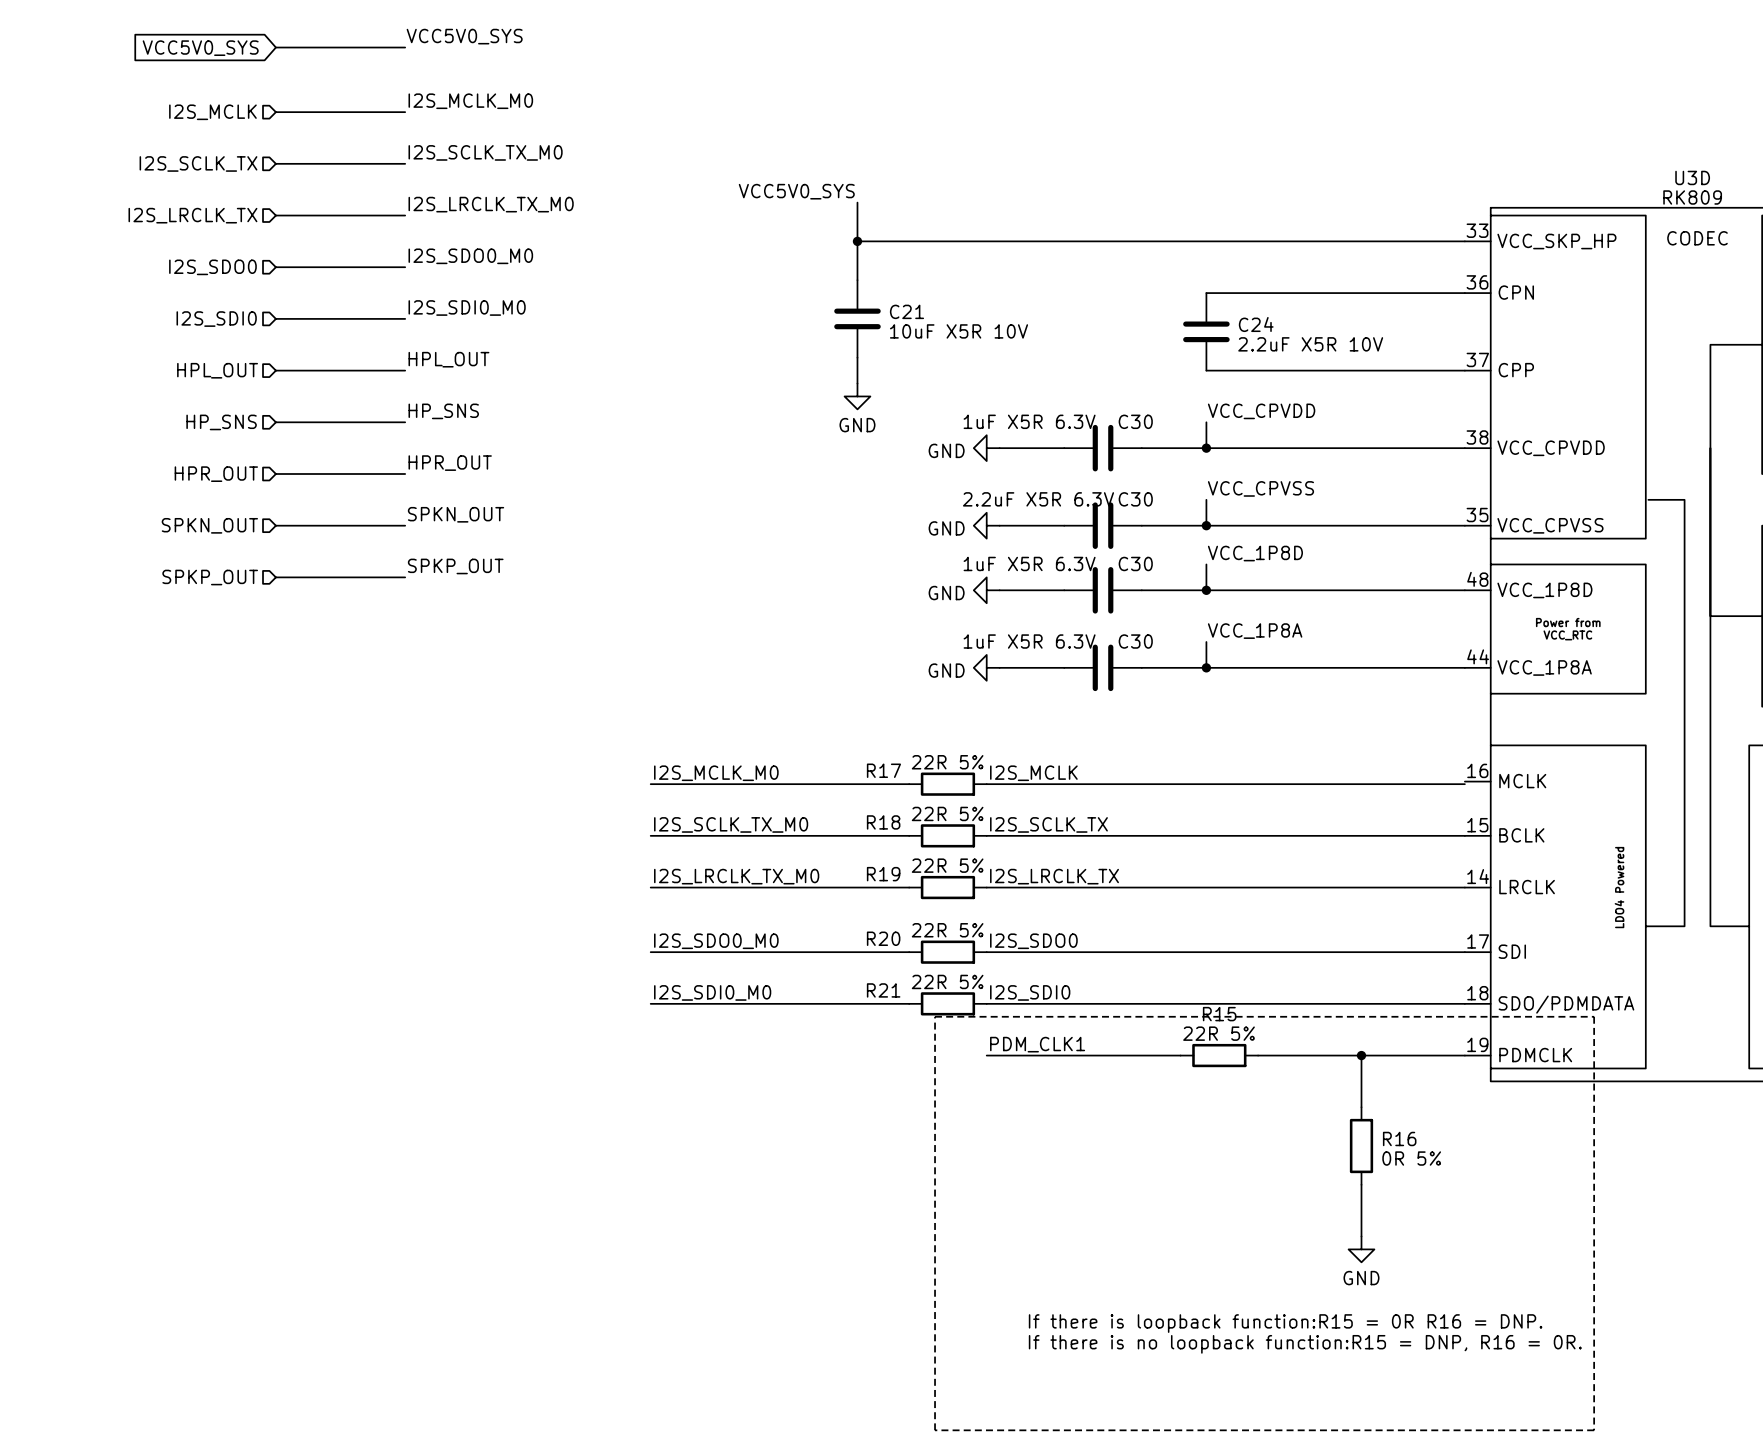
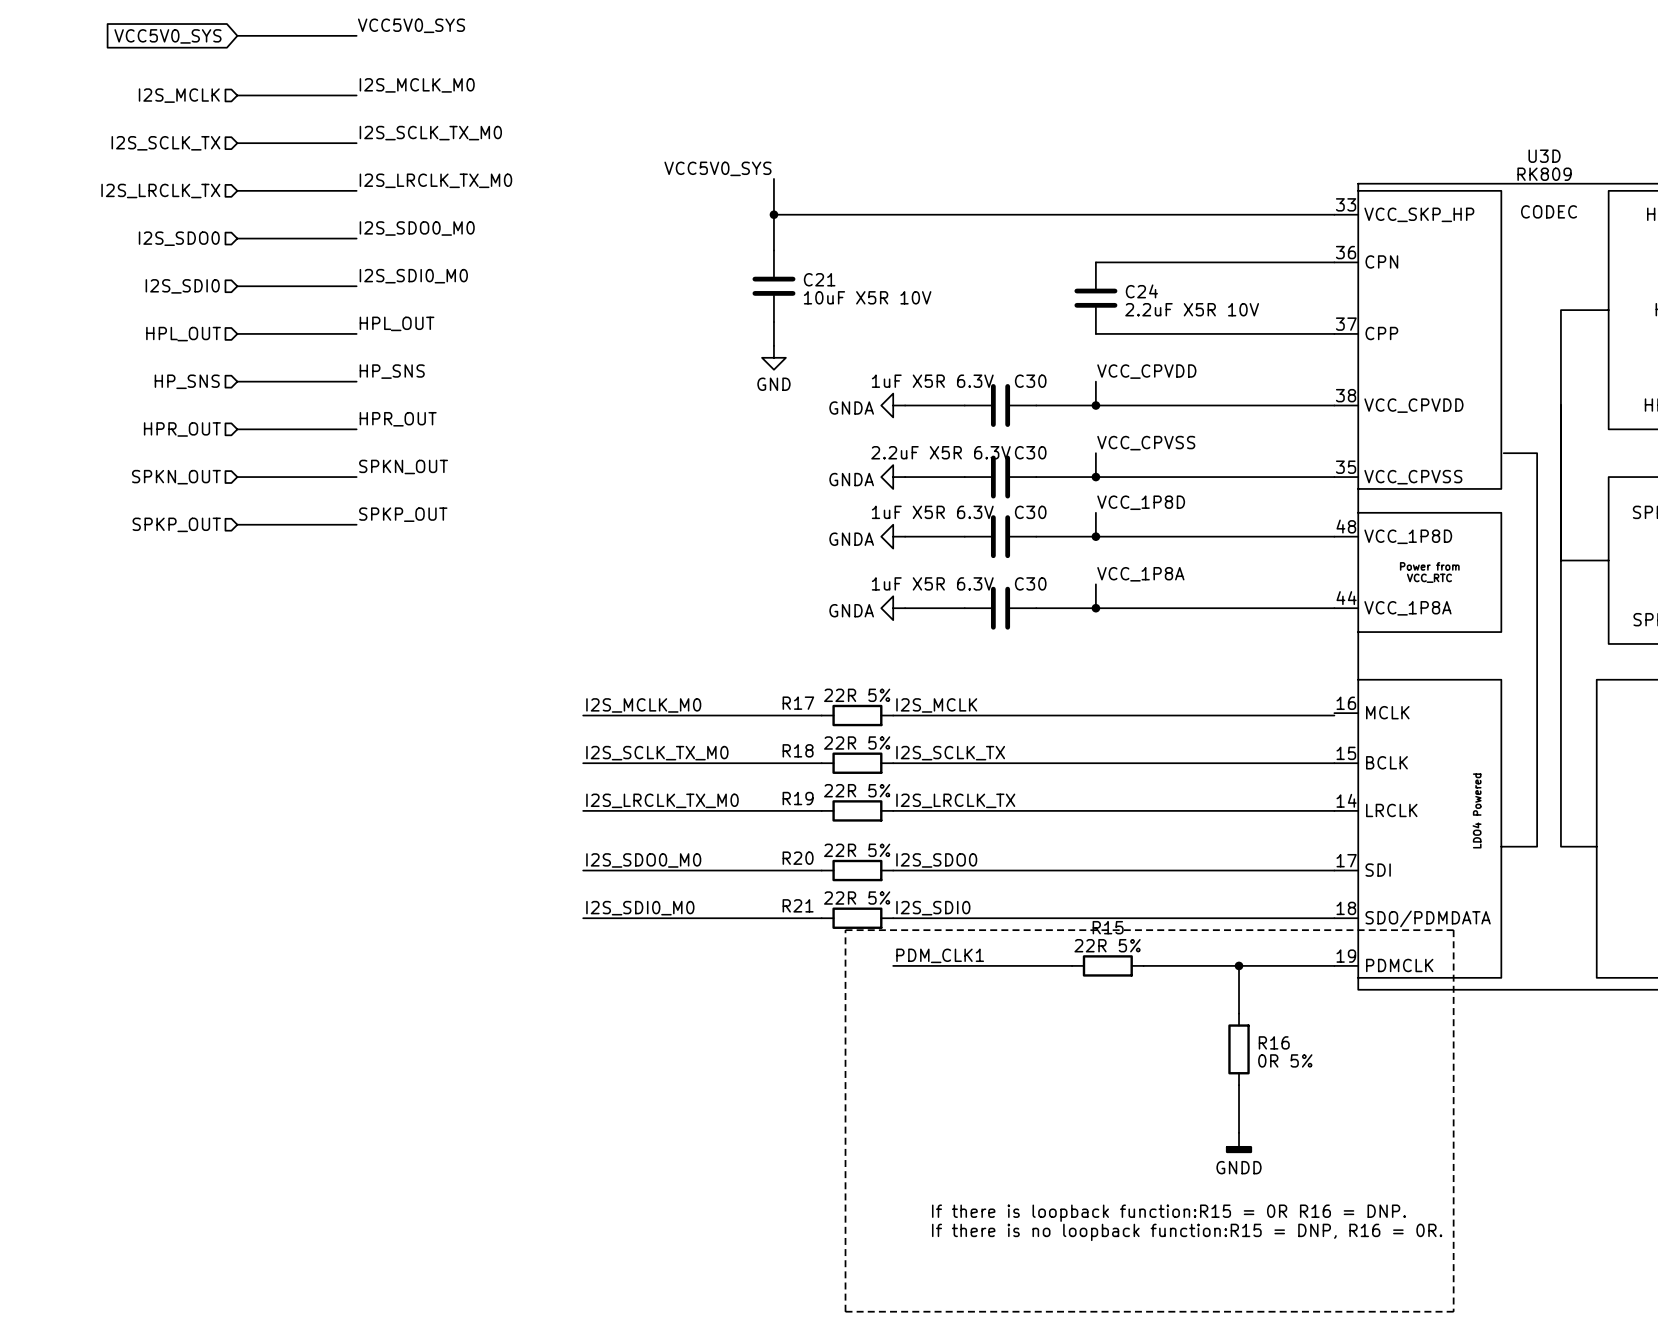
power symbol: GND (986, 448) -> GNDA (893, 405)
power symbol: GND (986, 525) -> GNDA (893, 477)
power symbol: GND (986, 590) -> GNDA (893, 536)
power symbol: GND (986, 667) -> GNDA (893, 608)
power symbol: GND (1361, 1249) -> GNDD (1239, 1143)

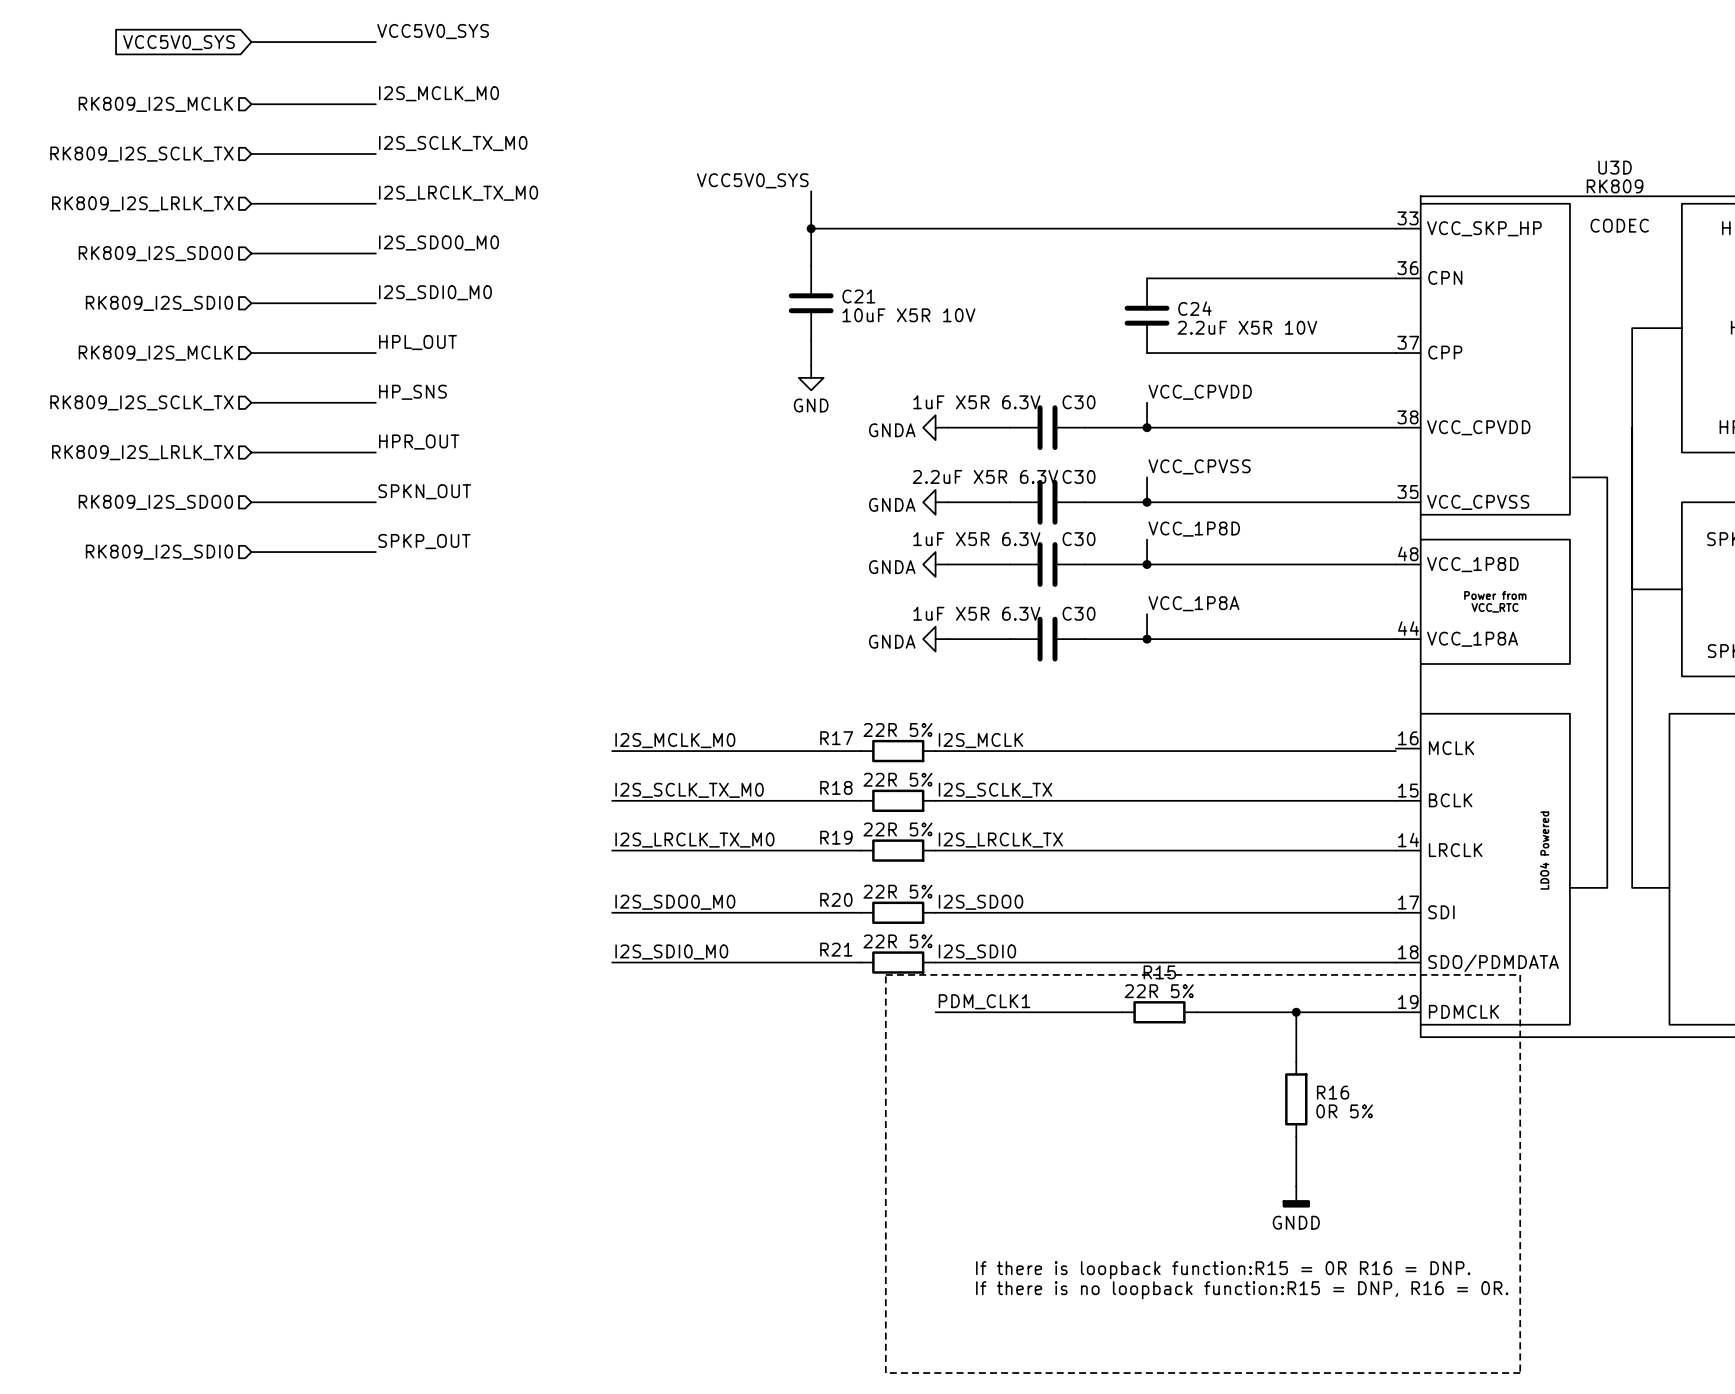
hierarchical label: I2S_MCLK (179, 95) -> RK809_I2S_MCLK (155, 104)
hierarchical label: I2S_SCLK_TX (165, 143) -> RK809_I2S_SCLK_TX (141, 154)
hierarchical label: I2S_LRCLK_TX (160, 190) -> RK809_I2S_LRLK_TX (142, 203)
hierarchical label: I2S_SDO0 (179, 238) -> RK809_I2S_SDO0 (155, 253)
hierarchical label: I2S_SDI0 (182, 286) -> RK809_I2S_SDI0 (159, 303)
hierarchical label: HPL_OUT (183, 334) -> RK809_I2S_MCLK (155, 353)
hierarchical label: HP_SNS (187, 381) -> RK809_I2S_SCLK_TX (141, 402)
hierarchical label: HPR_OUT (182, 429) -> RK809_I2S_LRLK_TX (142, 452)
hierarchical label: SPKN_OUT (176, 477) -> RK809_I2S_SDO0 (155, 502)
hierarchical label: SPKP_OUT (176, 524) -> RK809_I2S_SDI0 (159, 552)

